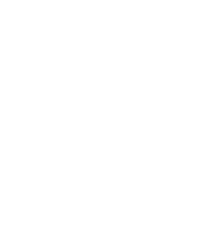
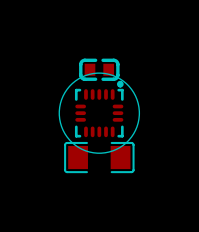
part: none -> (99, 69)
drawing: none -> [58, 72, 141, 154]
part: none -> (99, 109)
part: none -> (99, 157)

